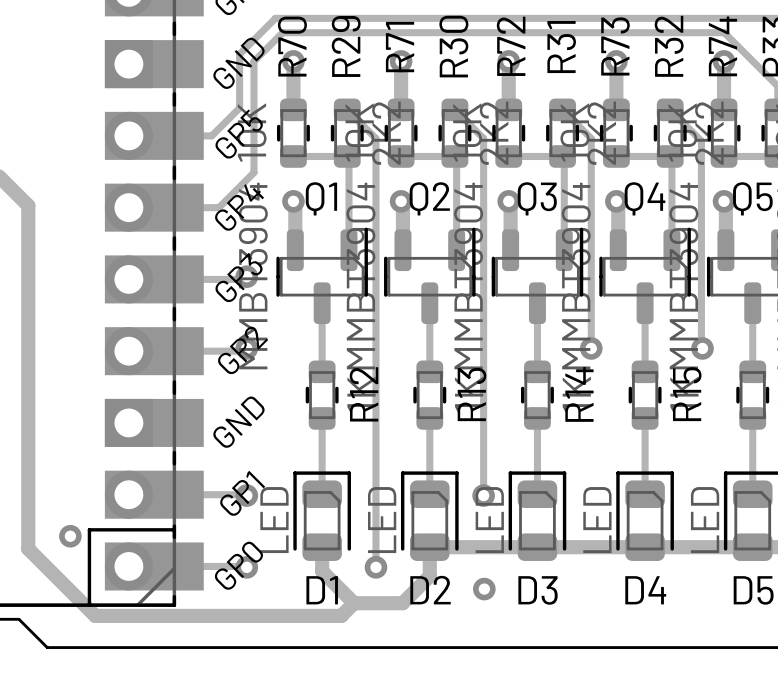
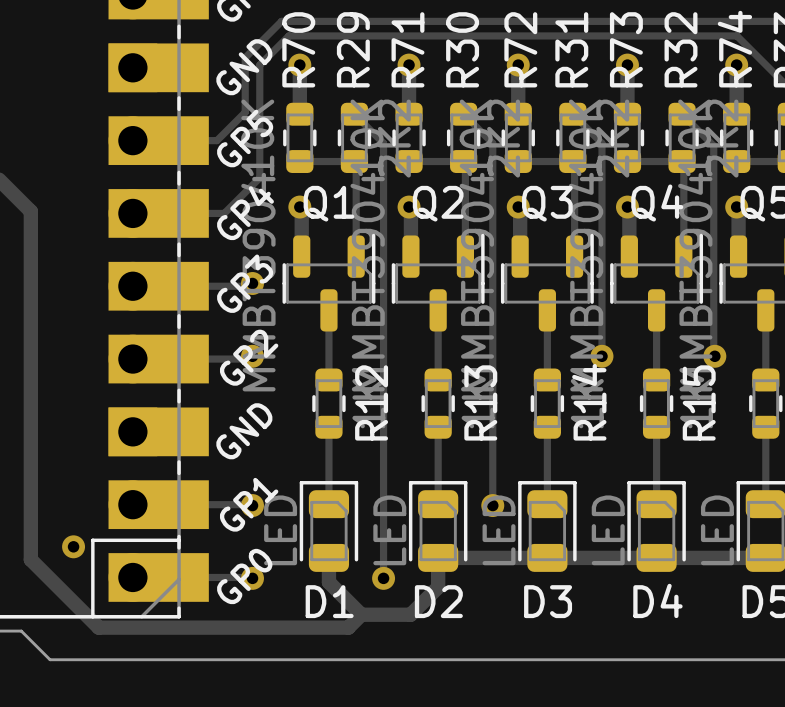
via: (484, 589) -> none

